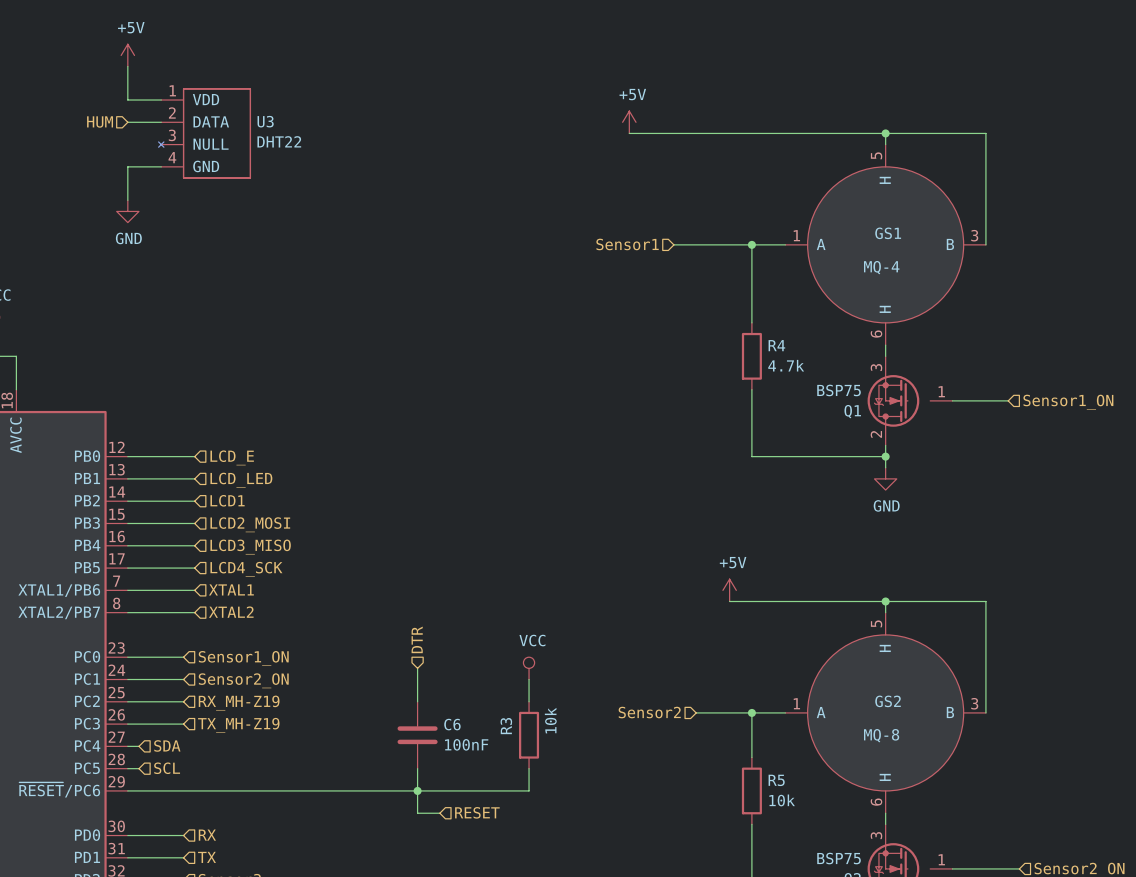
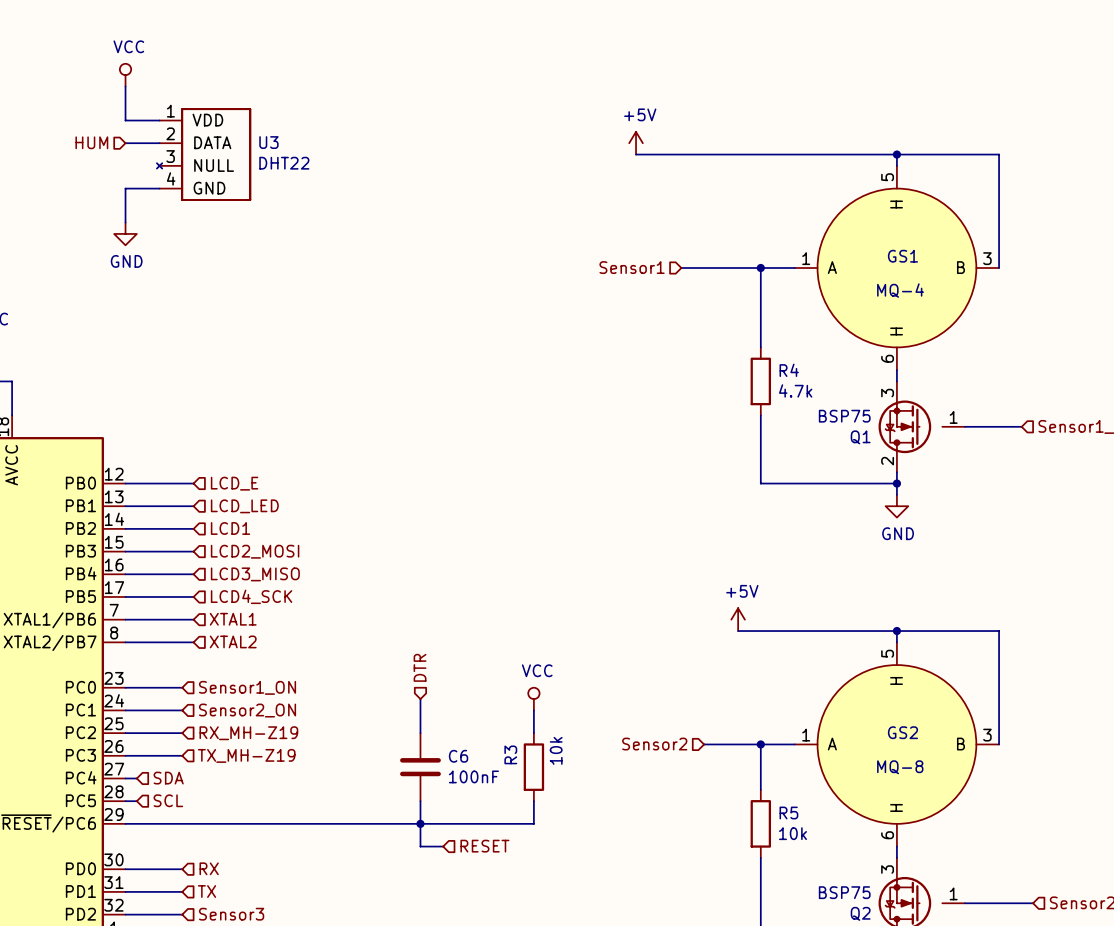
power symbol: +5V (127, 55) -> VCC (125, 75)

